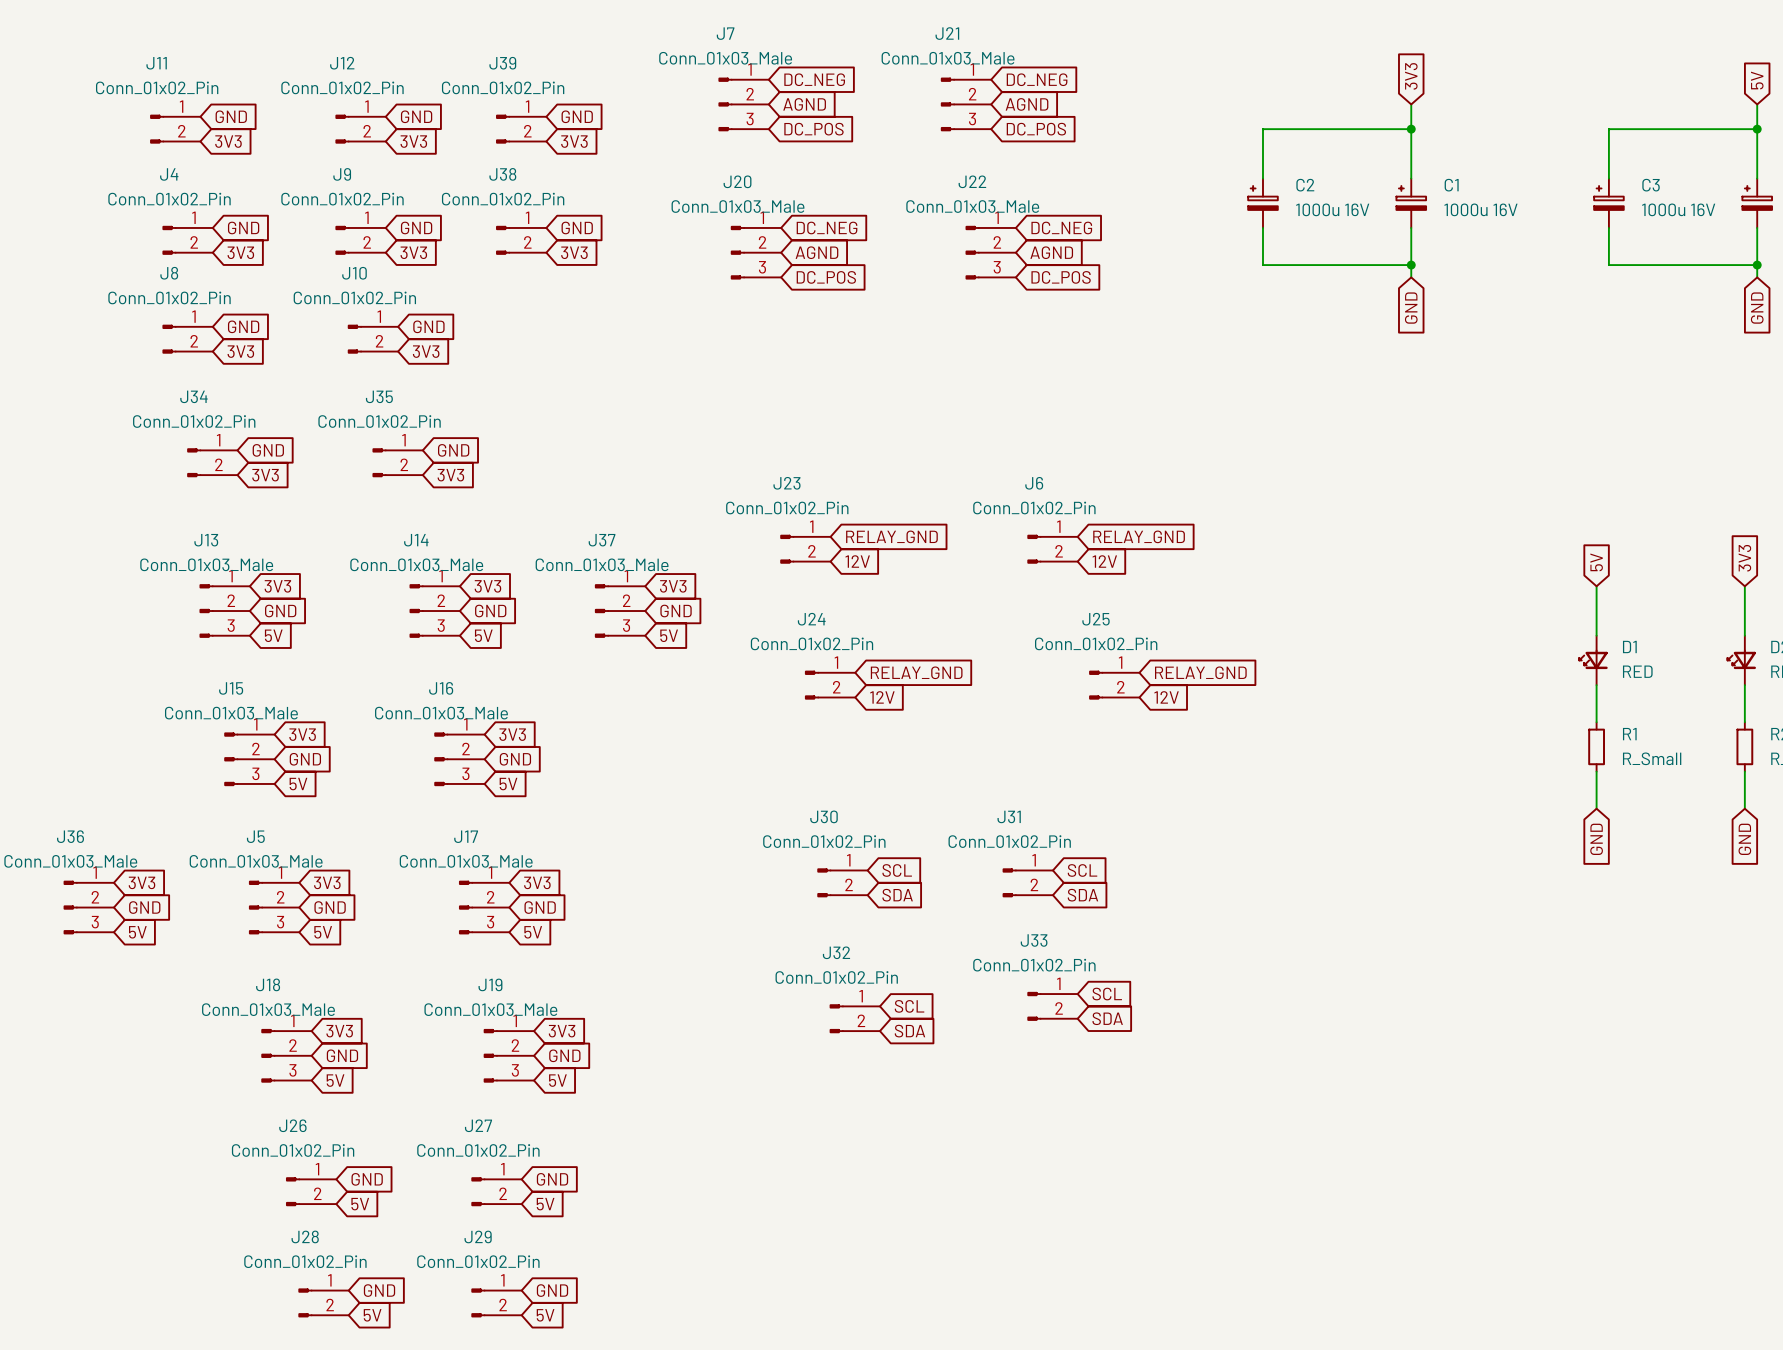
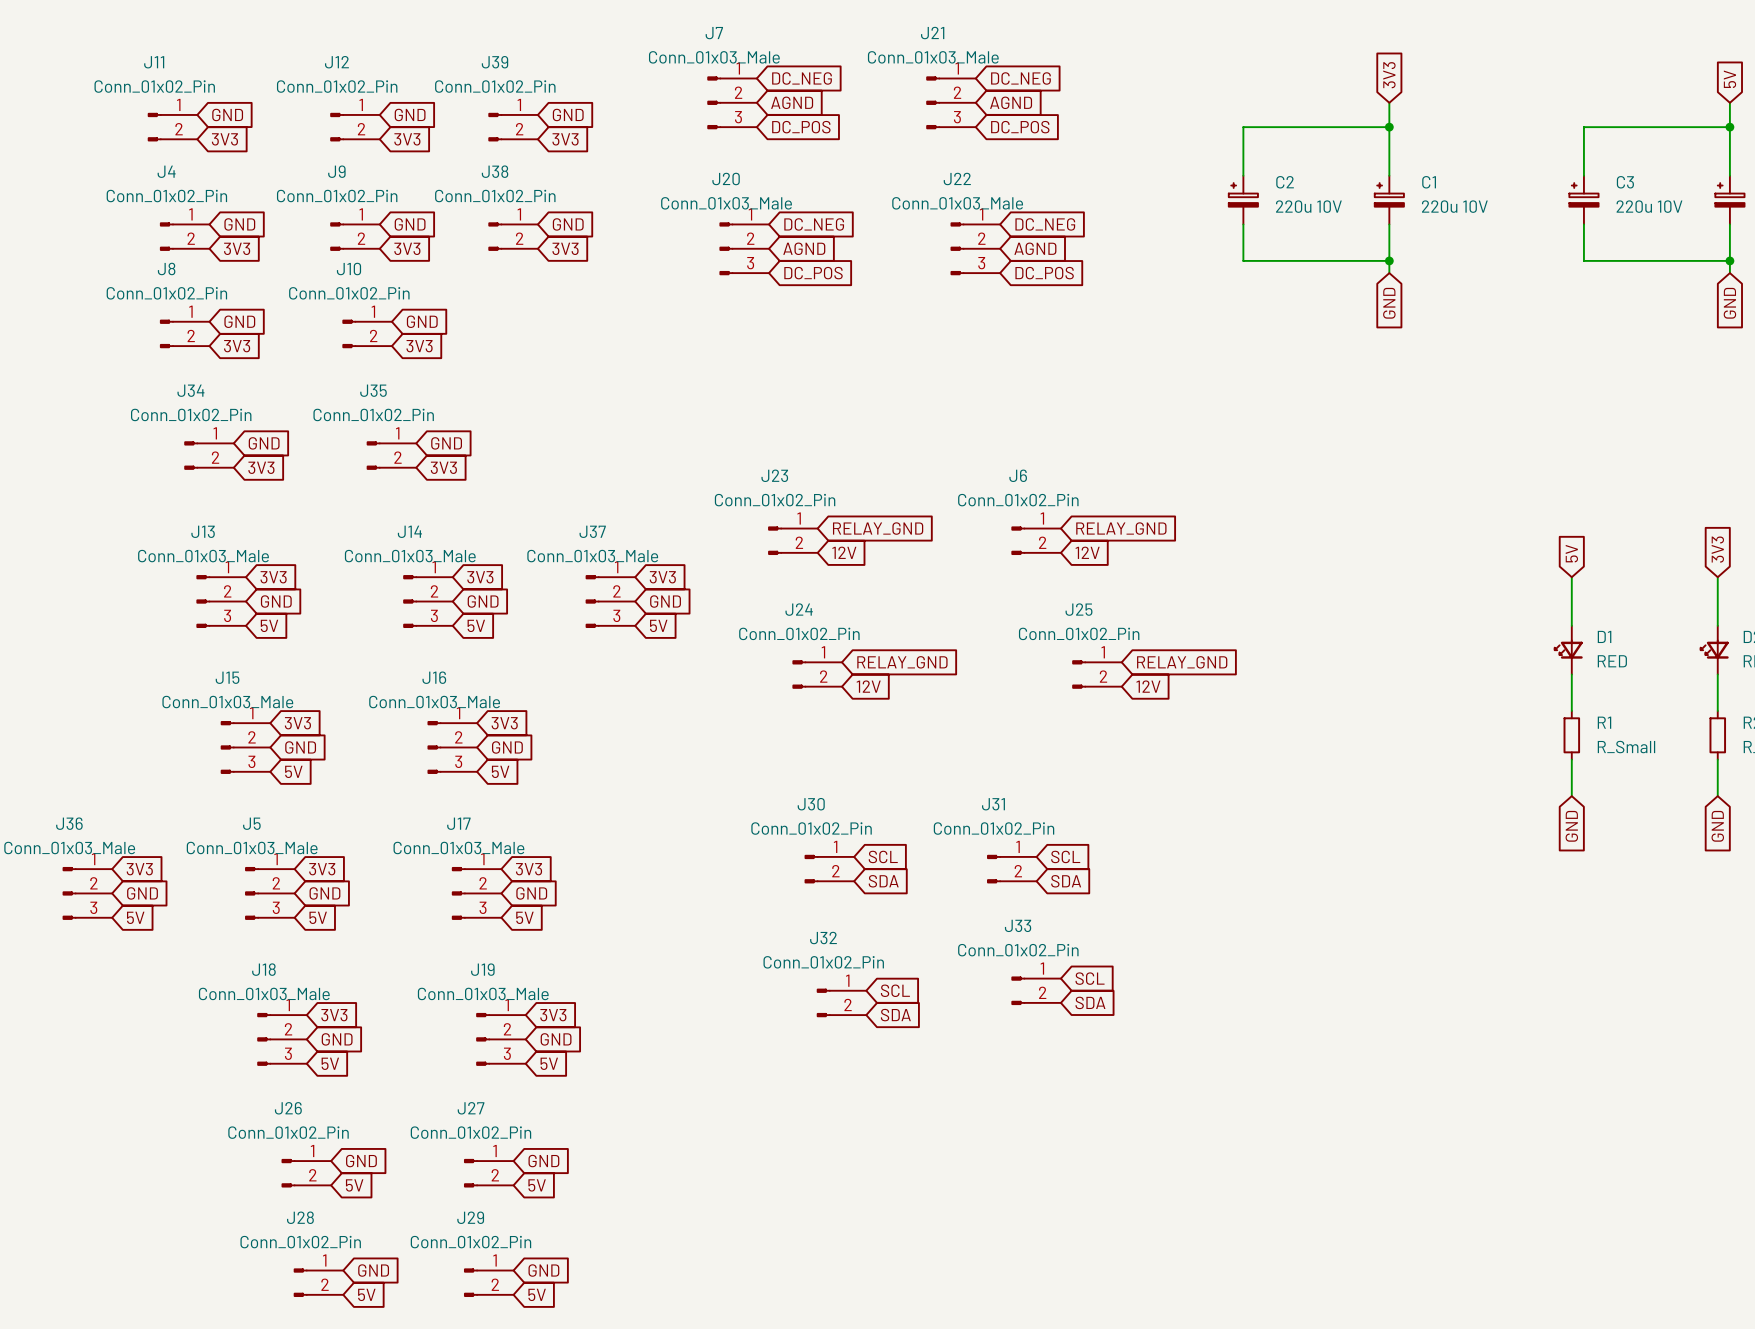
C2 value: 1000u 16V (1332, 209) -> 220u 10V (1308, 206)
C1 value: 1000u 16V (1480, 209) -> 220u 10V (1454, 206)
C3 value: 1000u 16V (1678, 209) -> 220u 10V (1649, 206)

